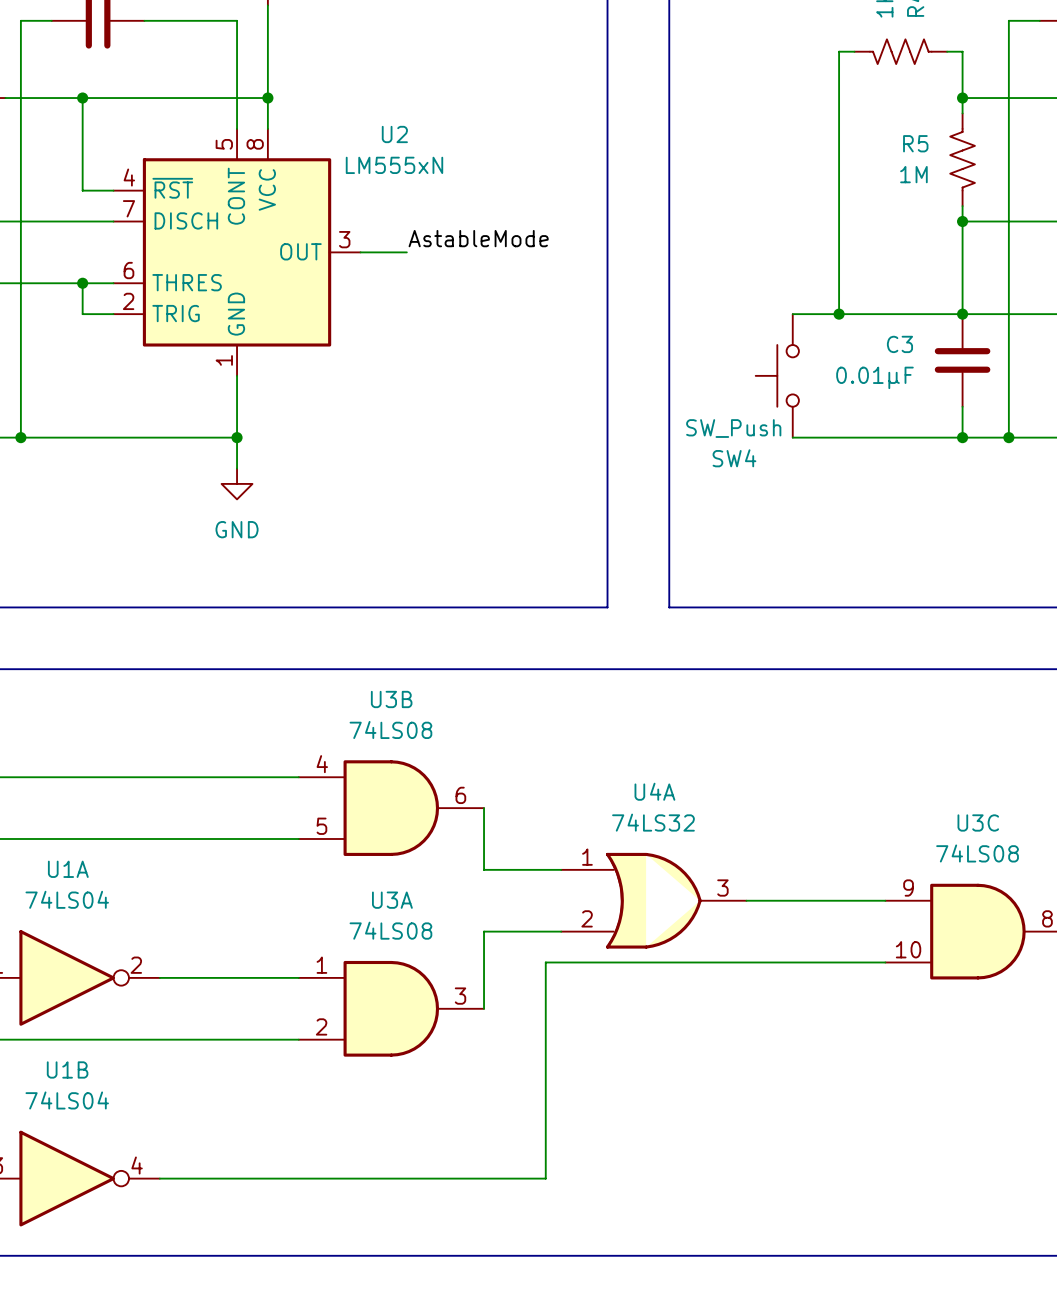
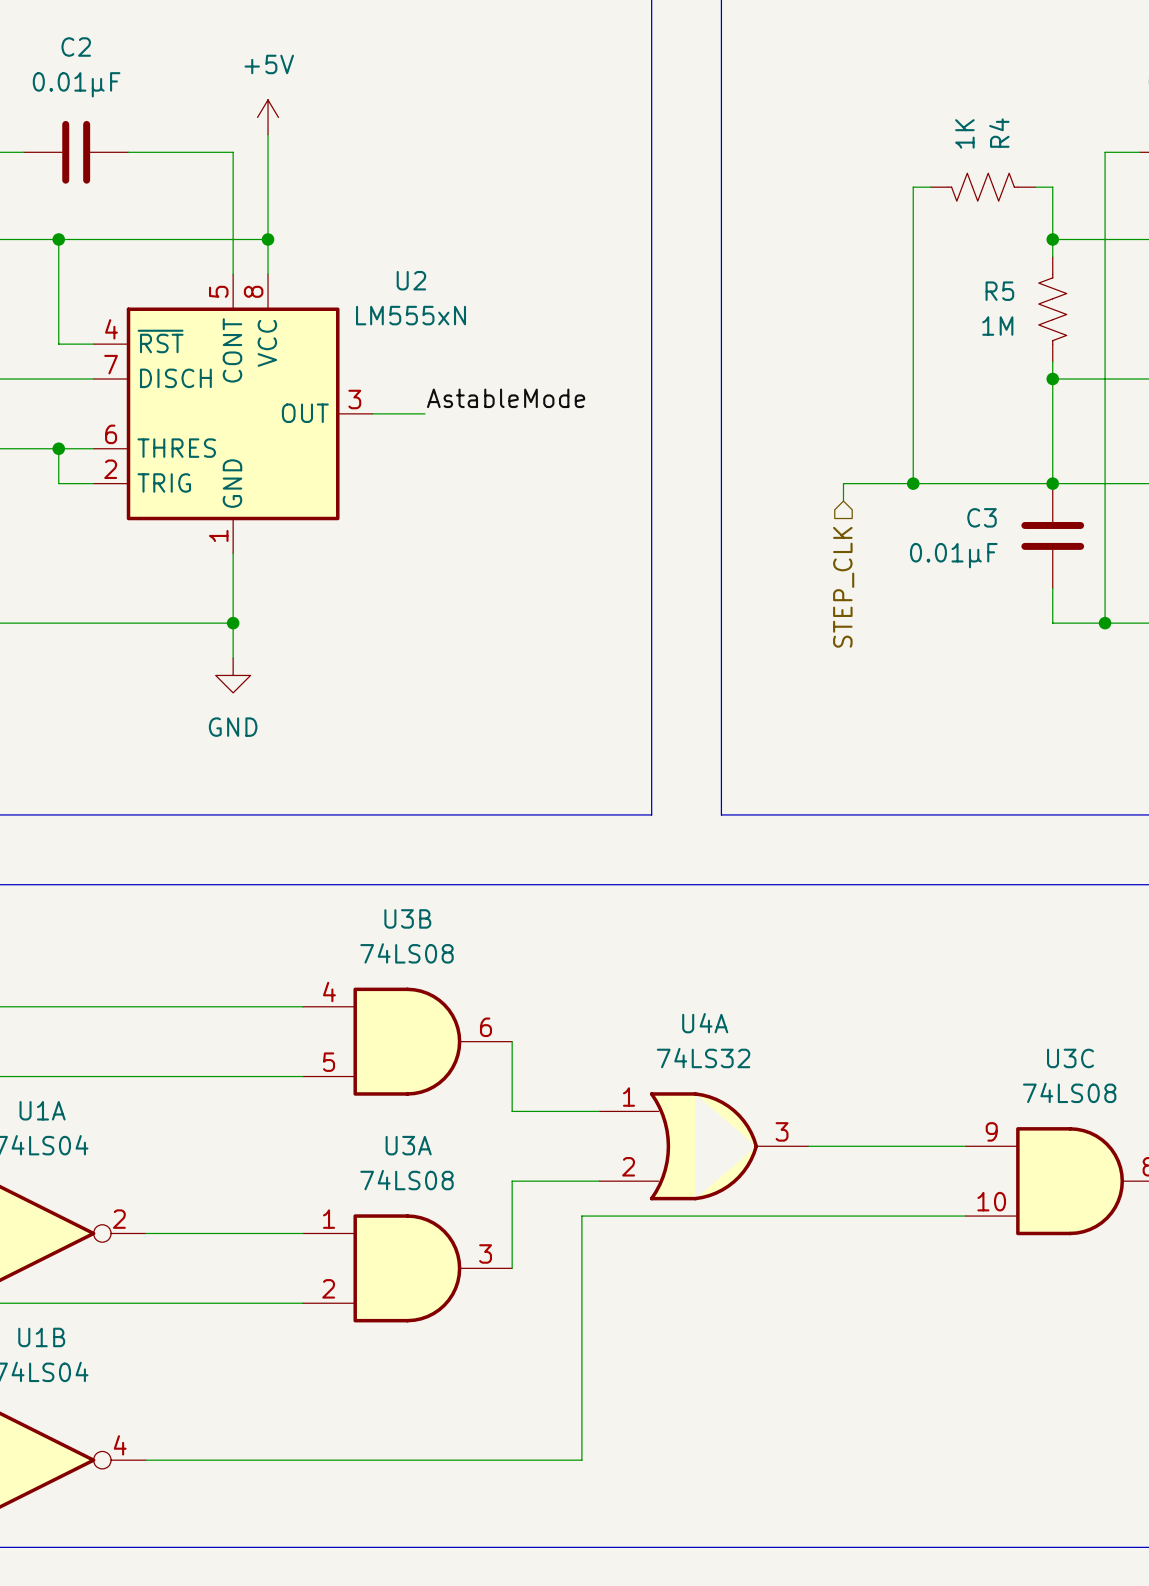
wire: none -> (860, 483) (843, 483) (843, 501)
SW4: SW_Push (777, 375) -> none
hierarchical label: none -> STEP_CLK (843, 587)
wire: (792, 437) (962, 437) -> none
junction: (962, 437) -> none

